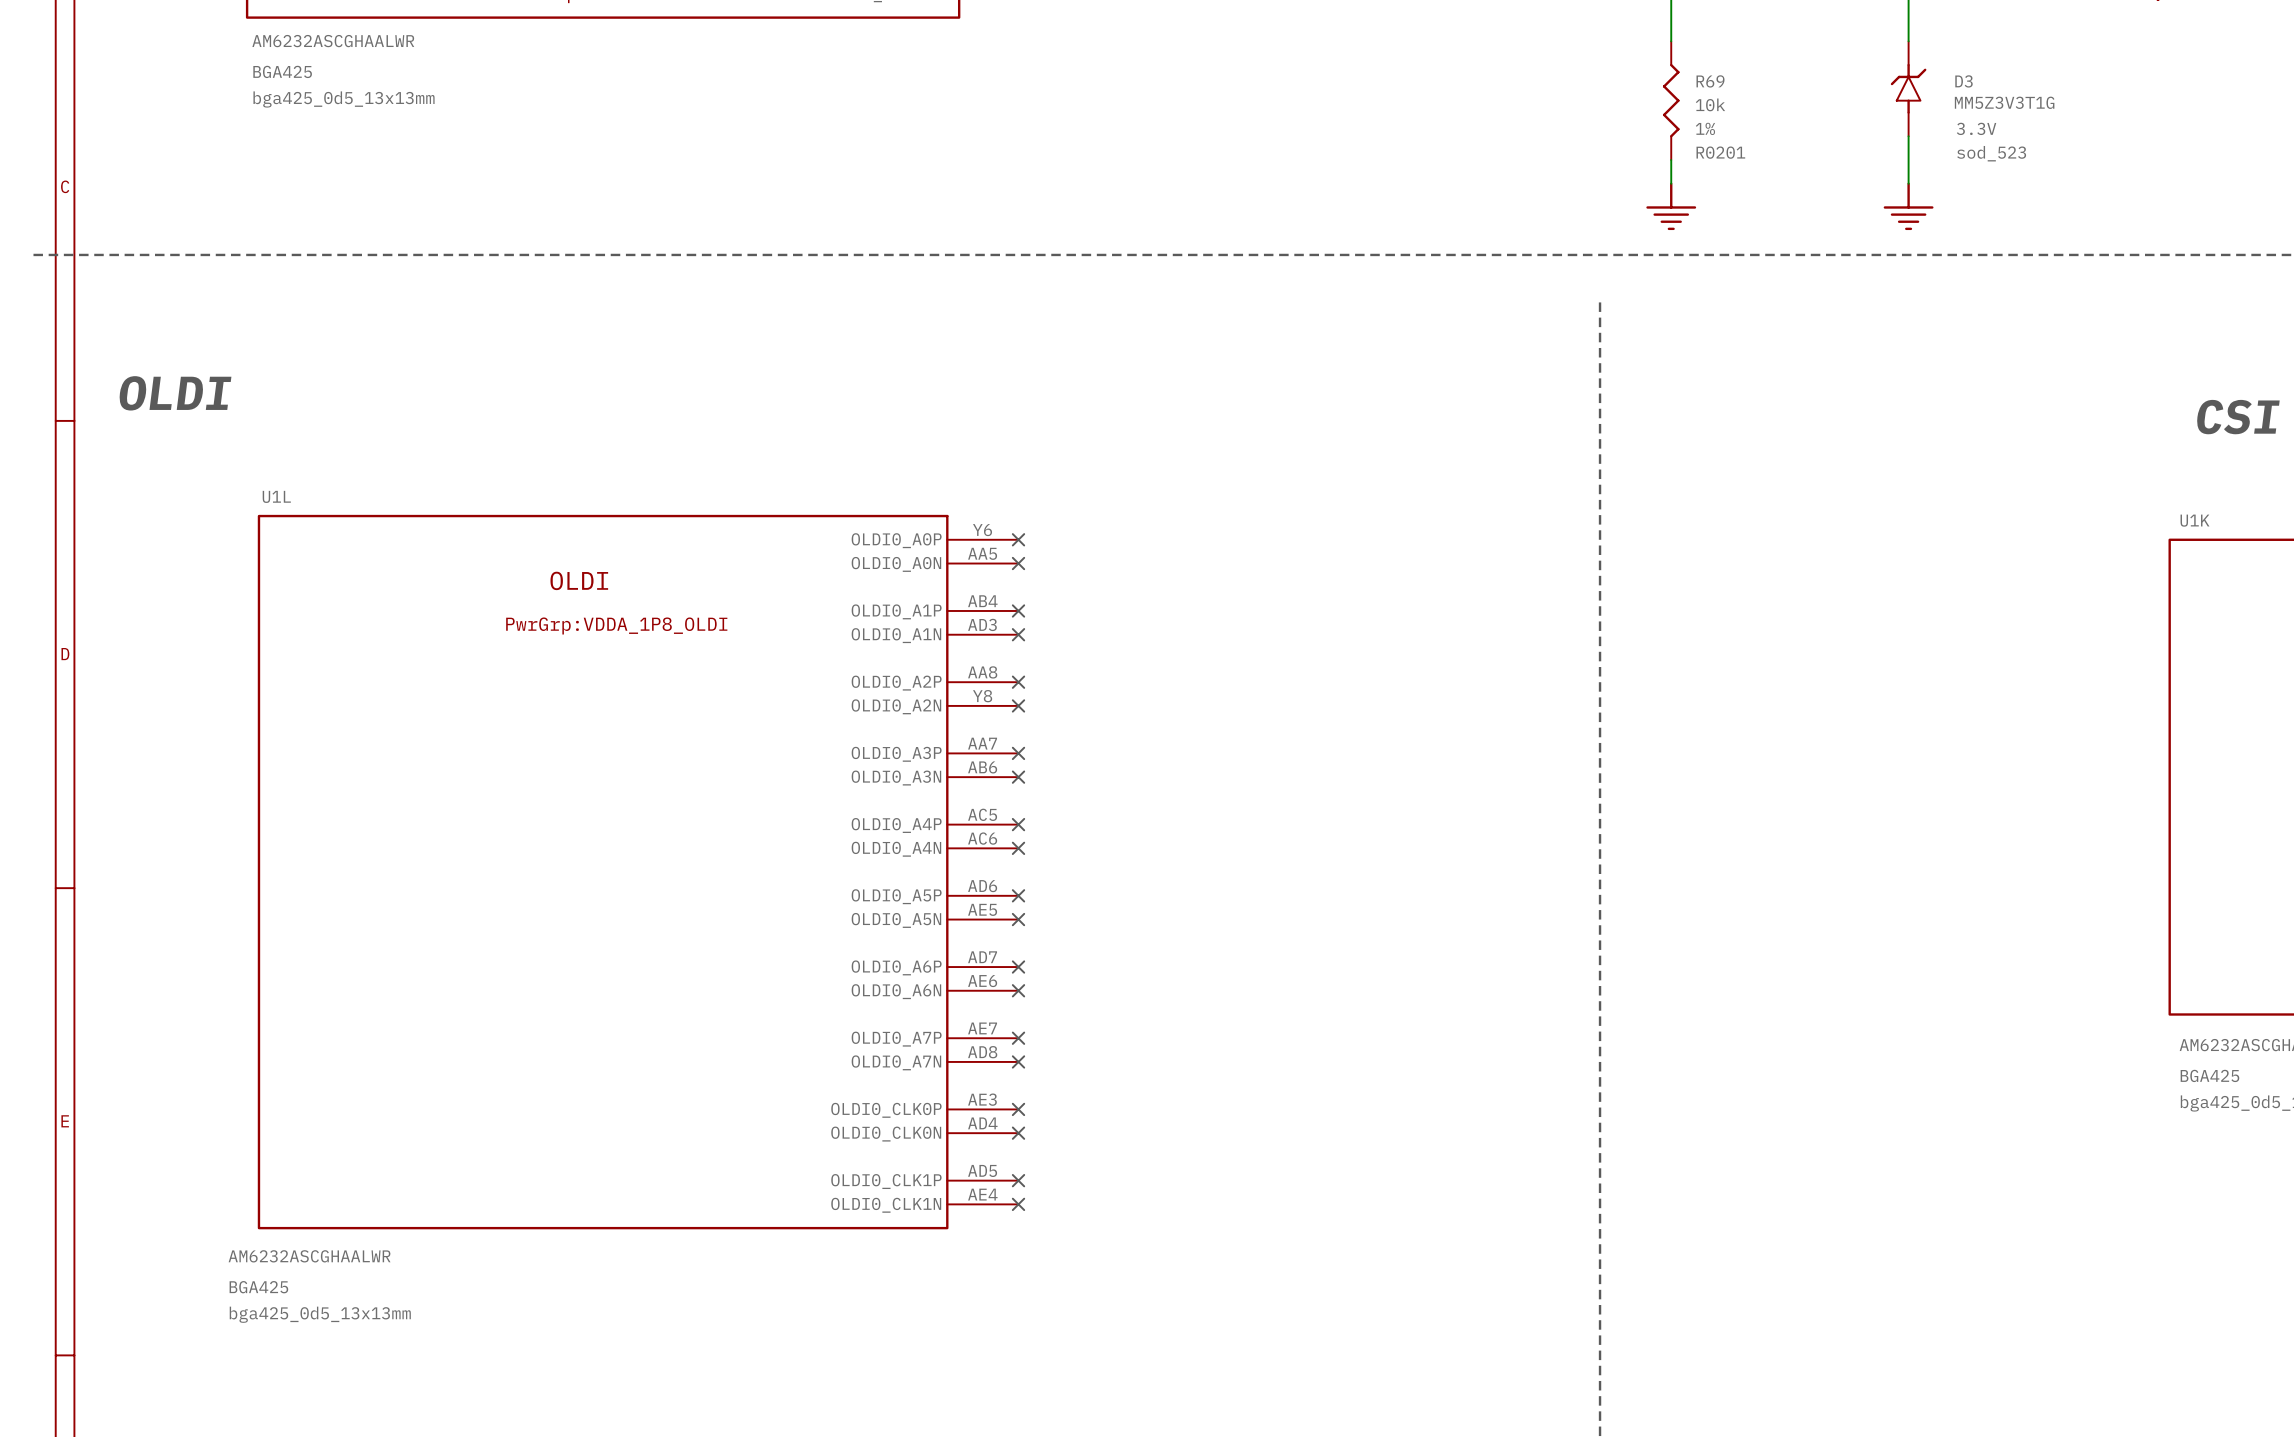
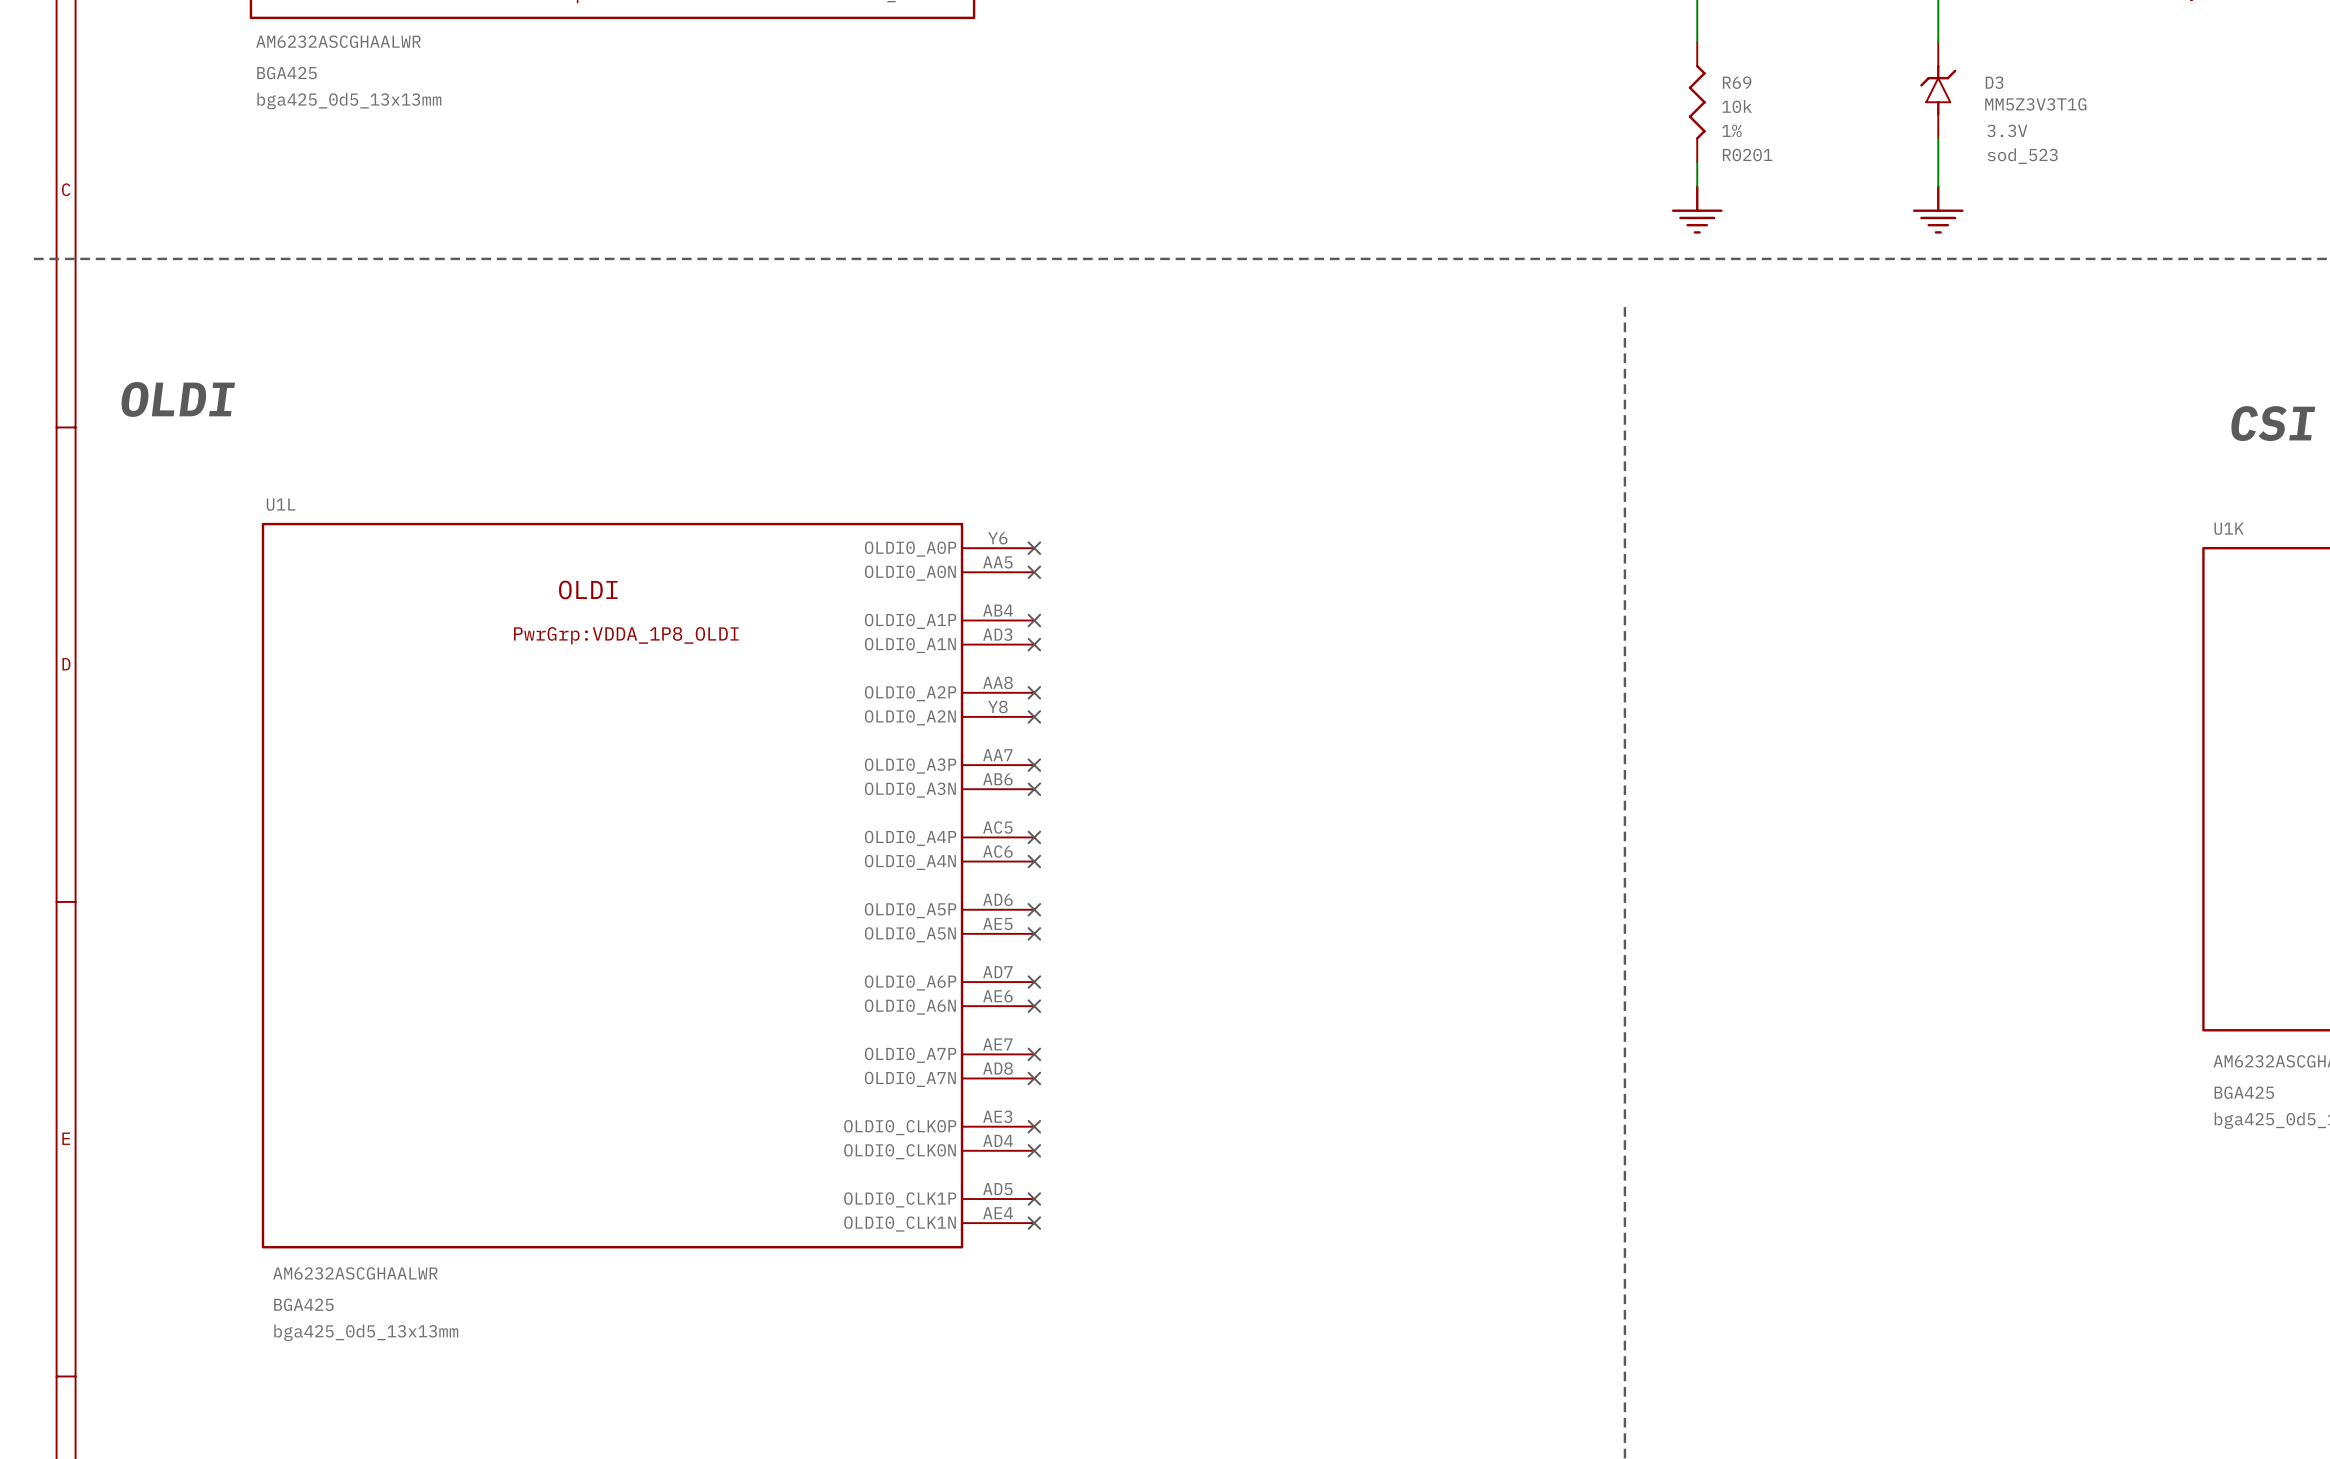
U1L value position: AM6232ASCGHAALWR (309, 1256) -> AM6232ASCGHAALWR (355, 1273)
U1L text position: BGA425 (258, 1287) -> BGA425 (303, 1304)
U1L text position: bga425_0d5_13x13mm (320, 1314) -> bga425_0d5_13x13mm (366, 1332)

